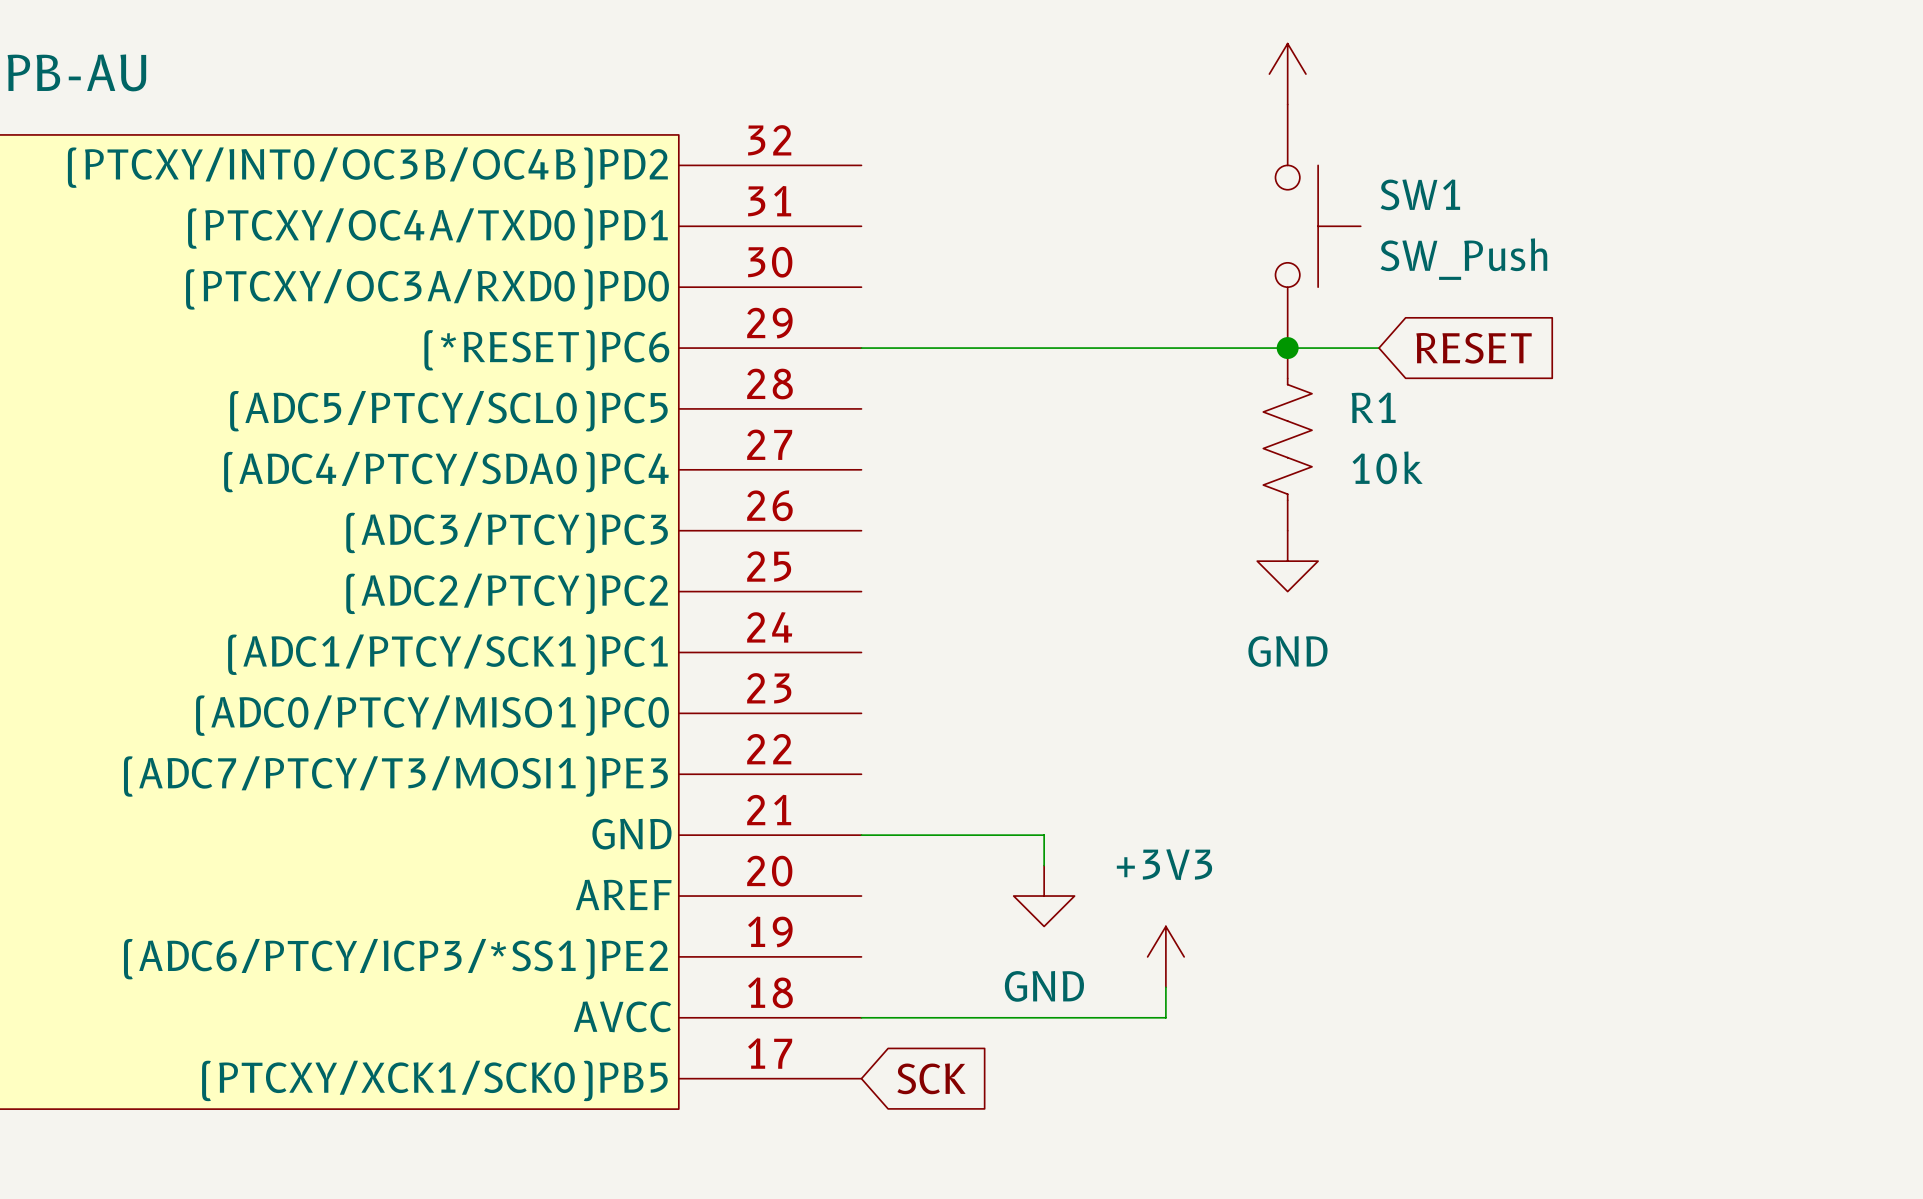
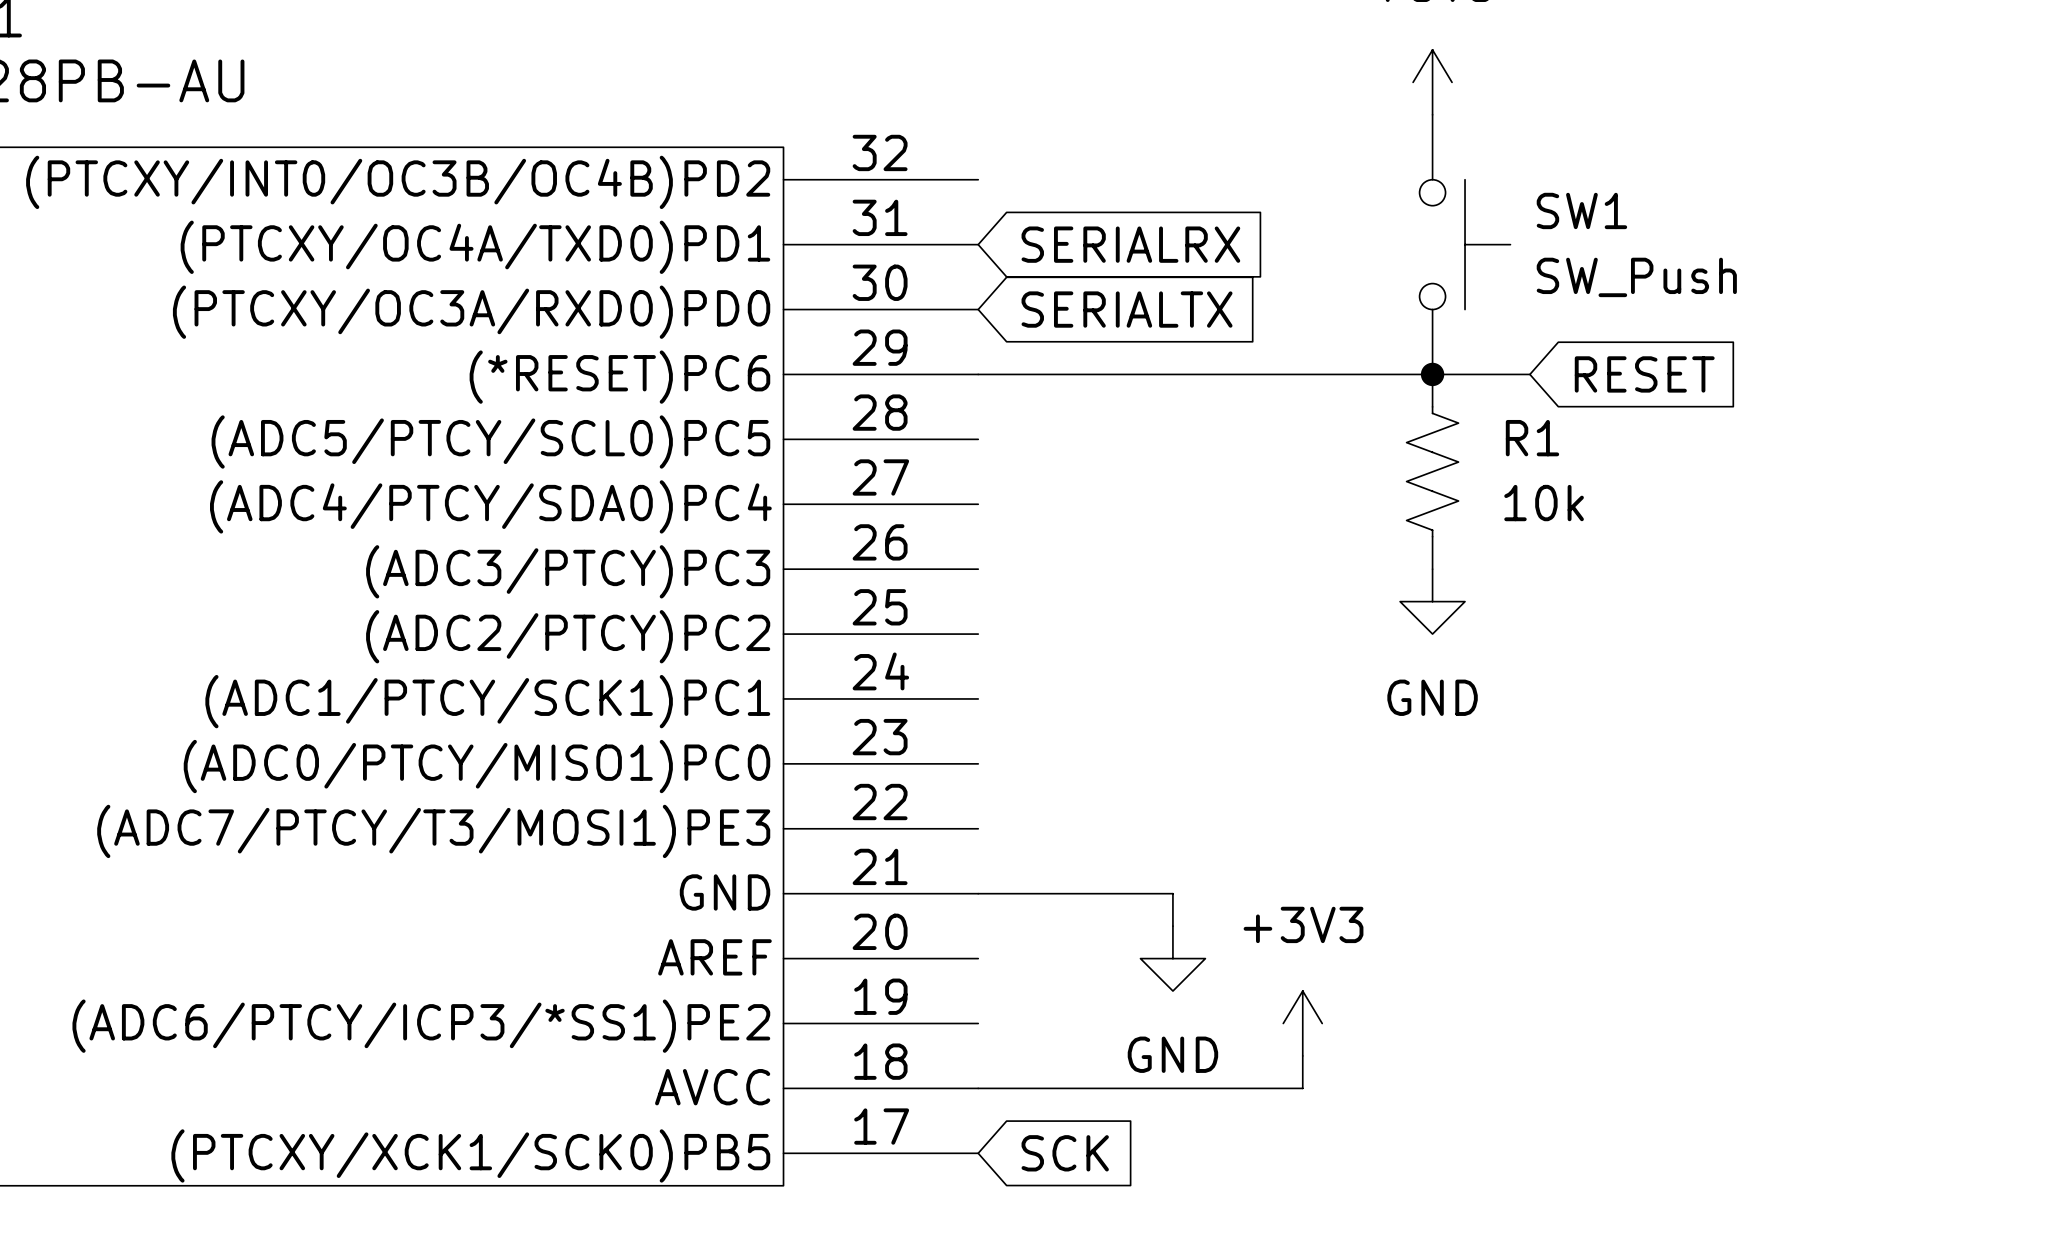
global label: none -> SERIALRX (1130, 244)
global label: none -> SERIALTX (1127, 309)

